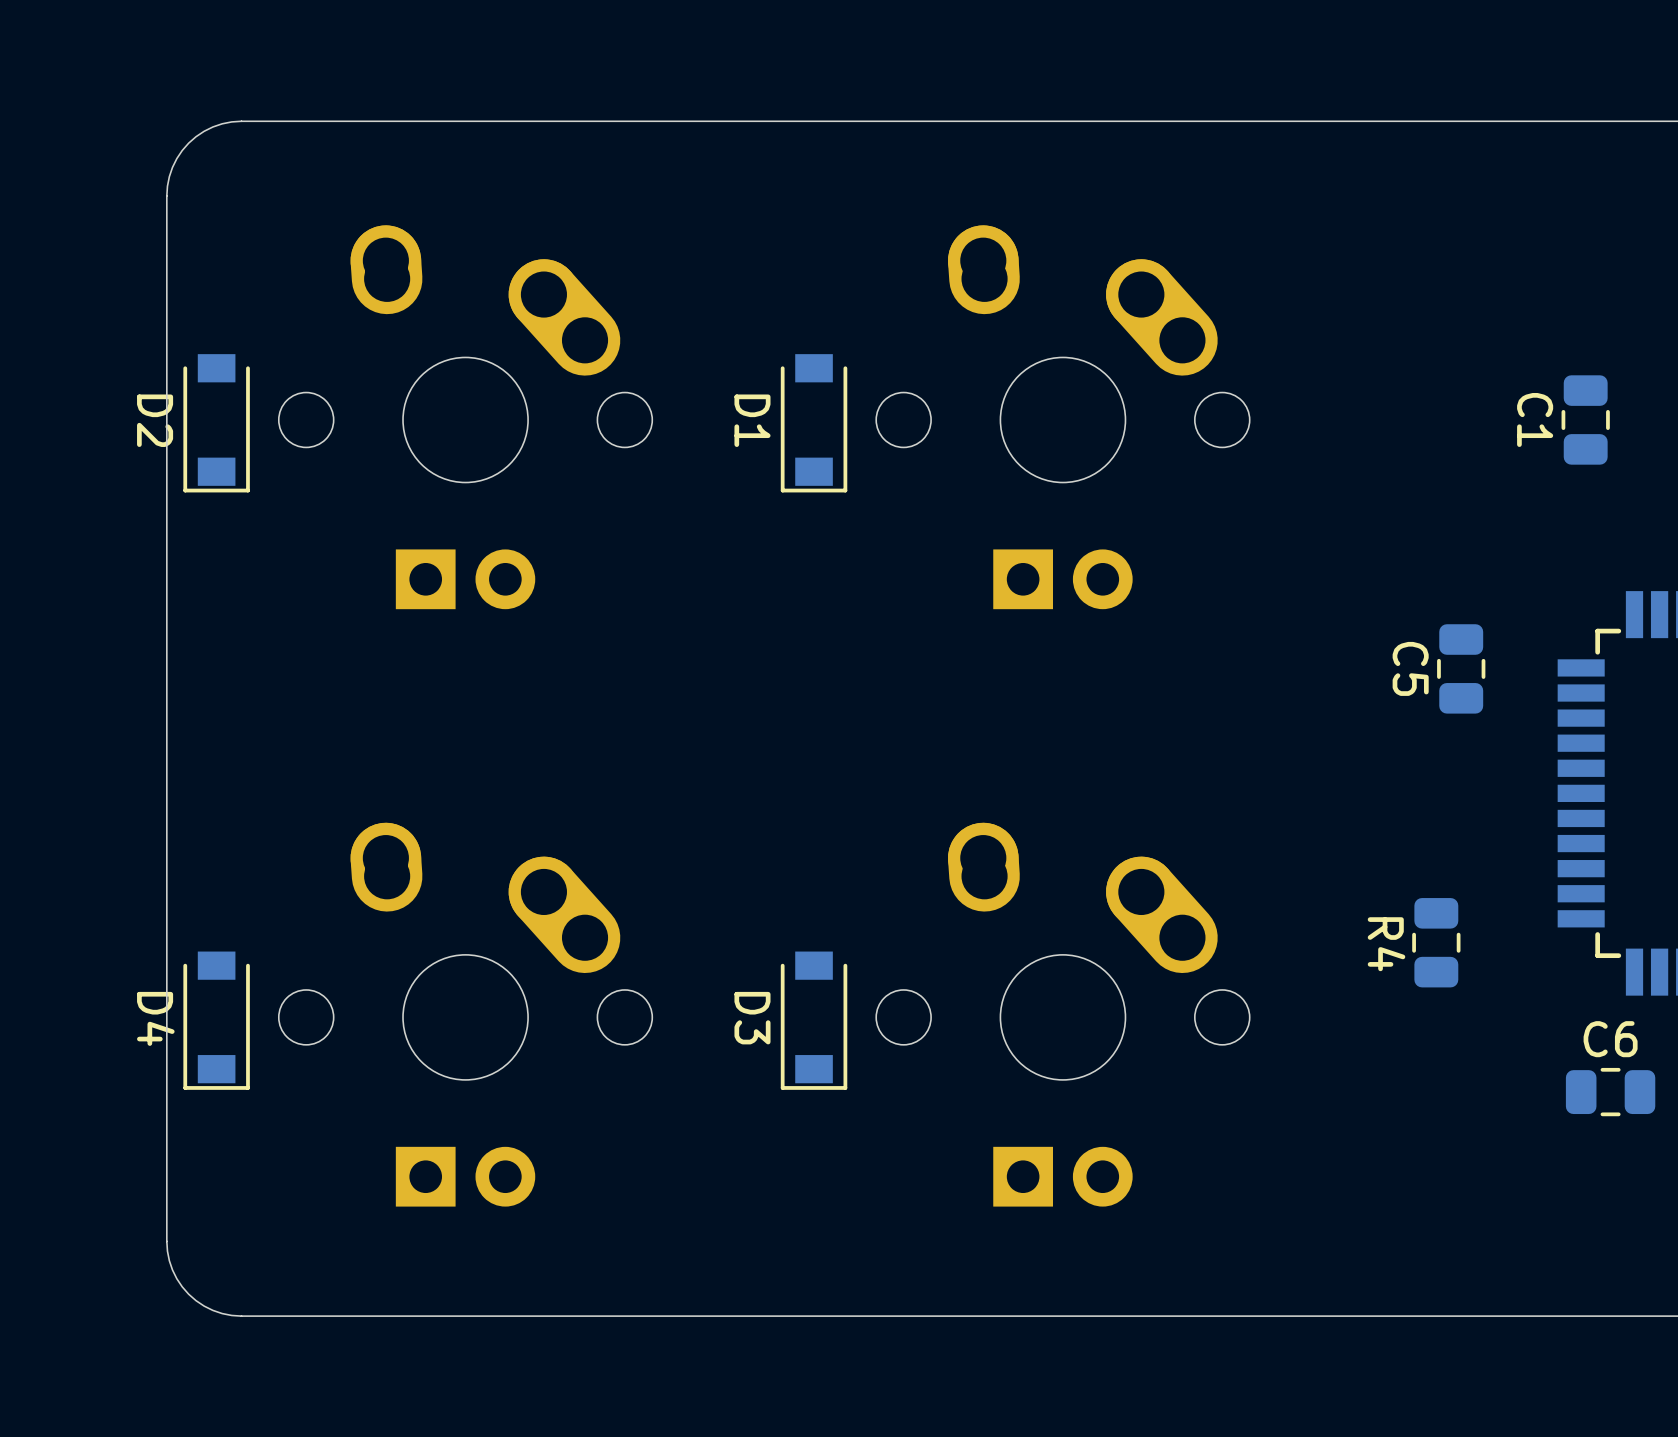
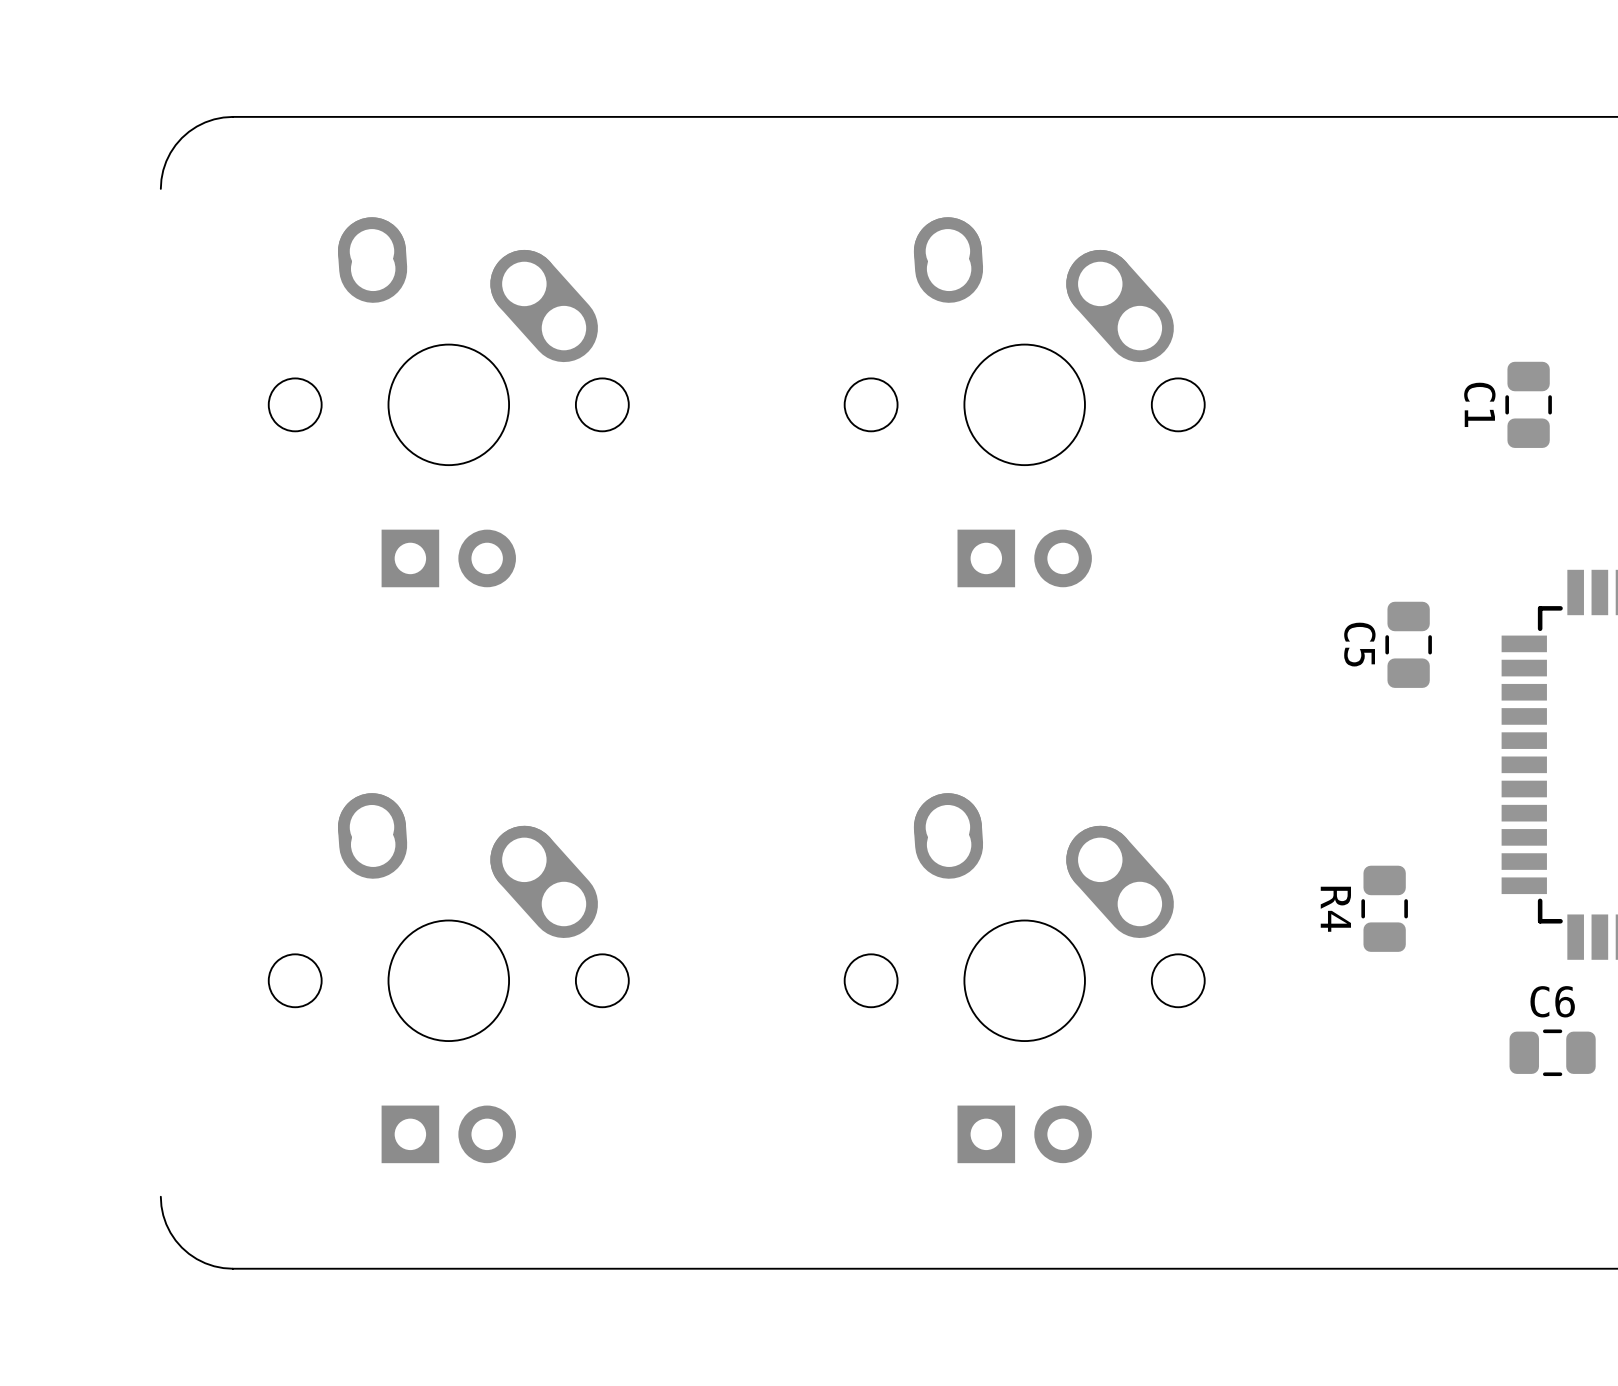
board edge: (166, 195) (166, 1241) -> none
D2: (216, 423) -> none
D1: (814, 423) -> none
D4: (216, 1020) -> none
D3: (814, 1020) -> none

